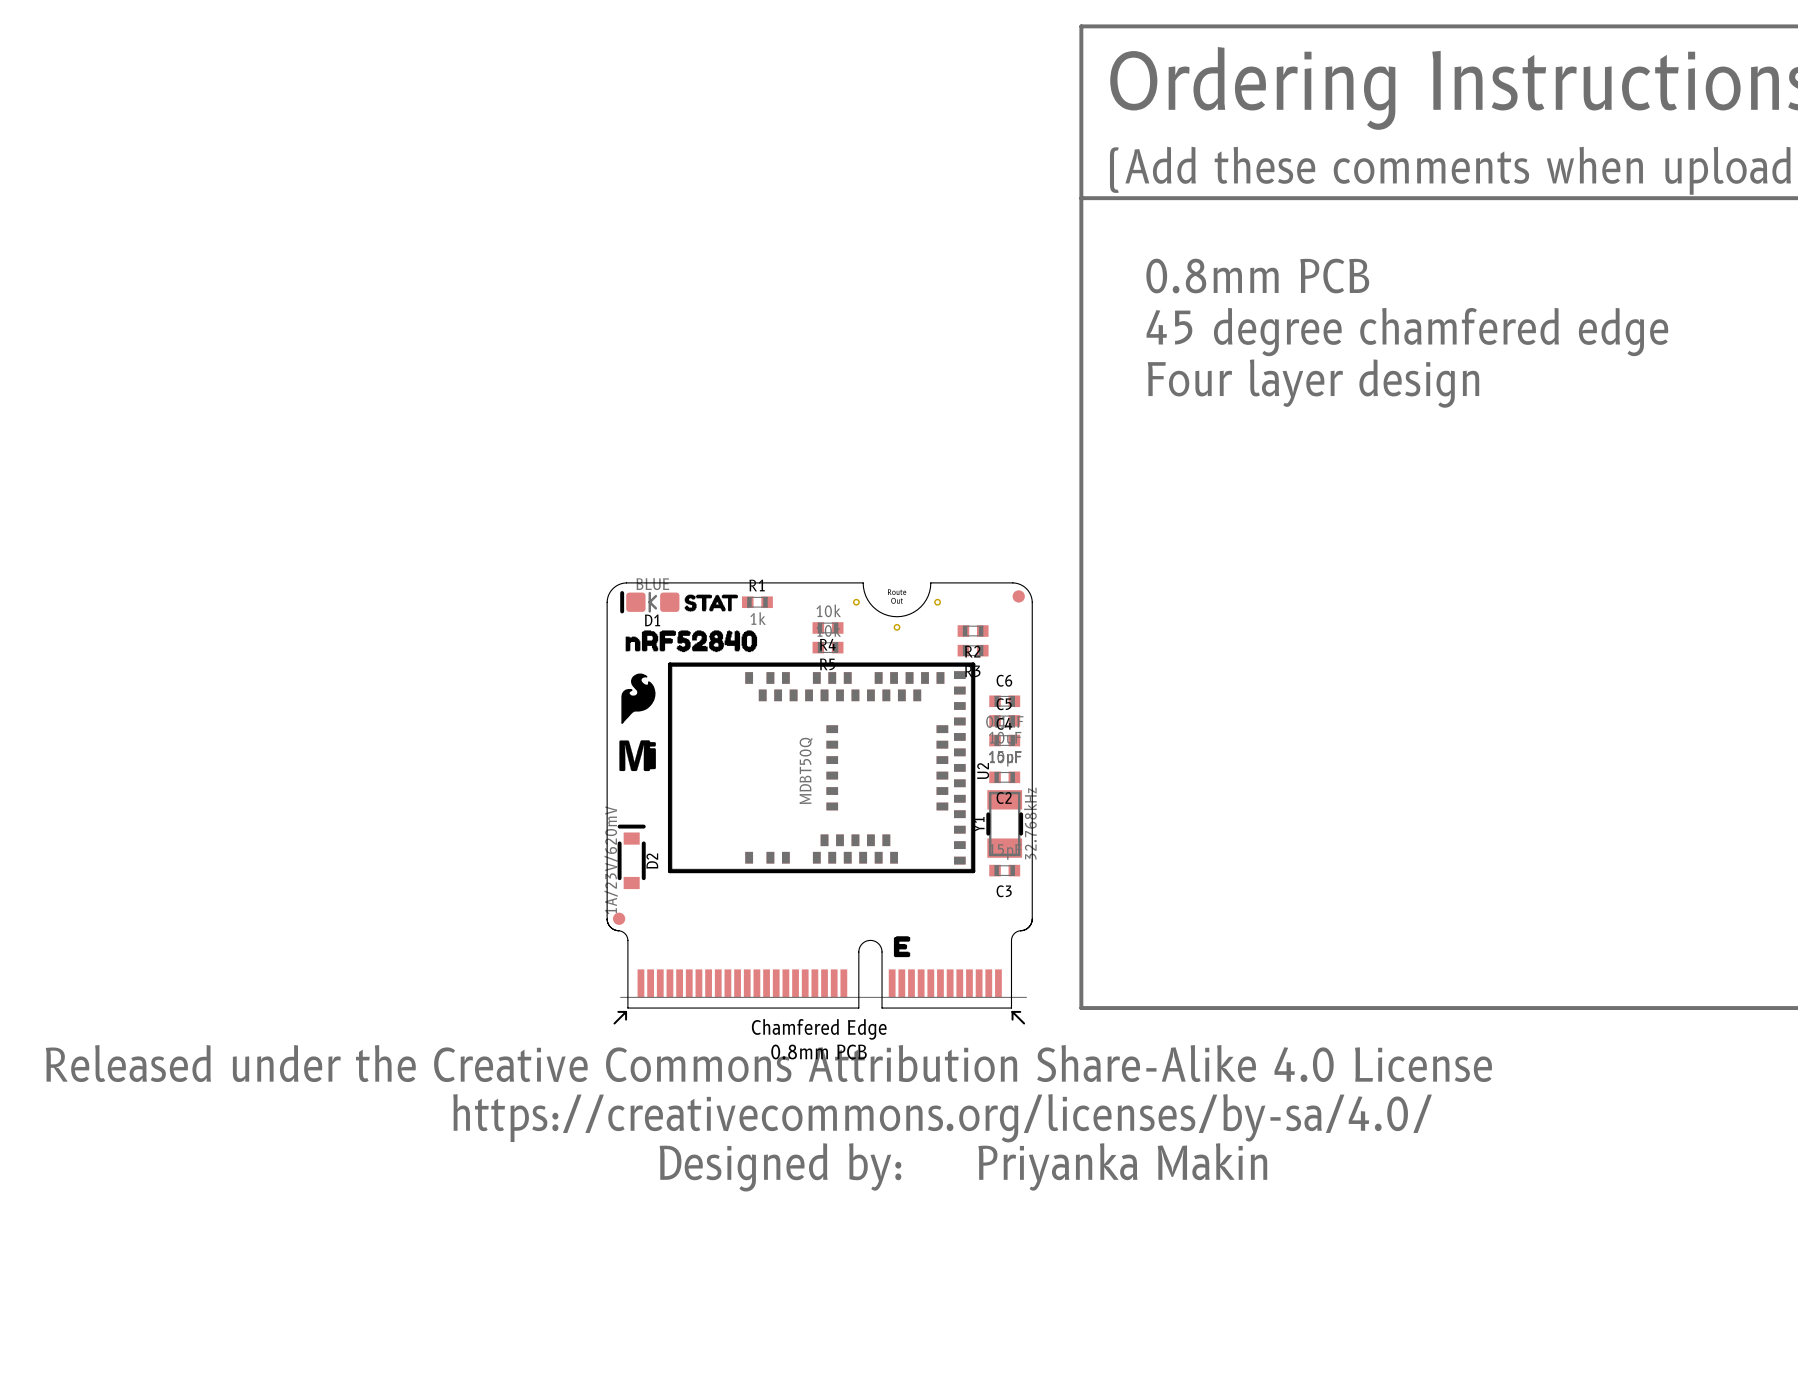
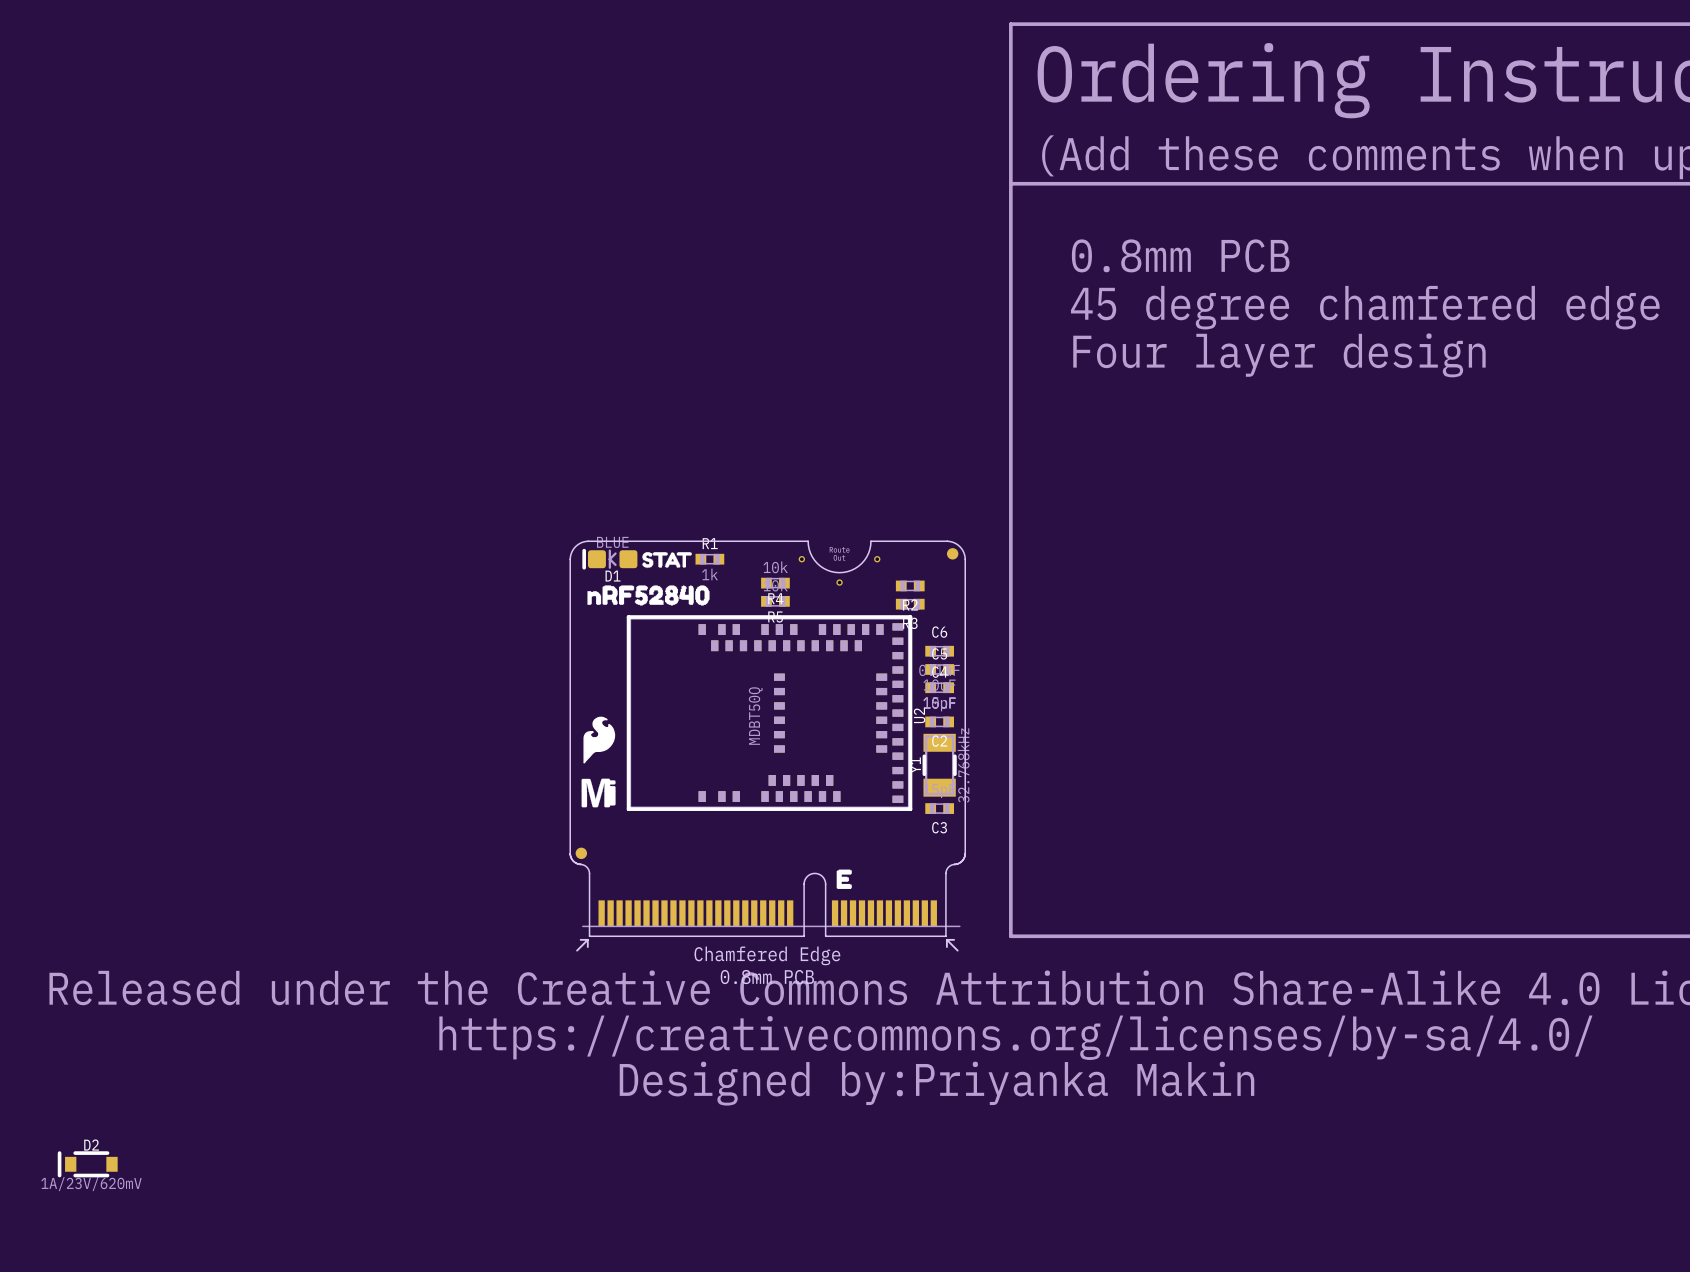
drawing position: (638, 698) -> (599, 740)
drawing position: (637, 755) -> (598, 793)
D2 rotation: 0° (631, 856) -> 90° counterclockwise (87, 1164)
D2 position: (631, 856) -> (87, 1164)

